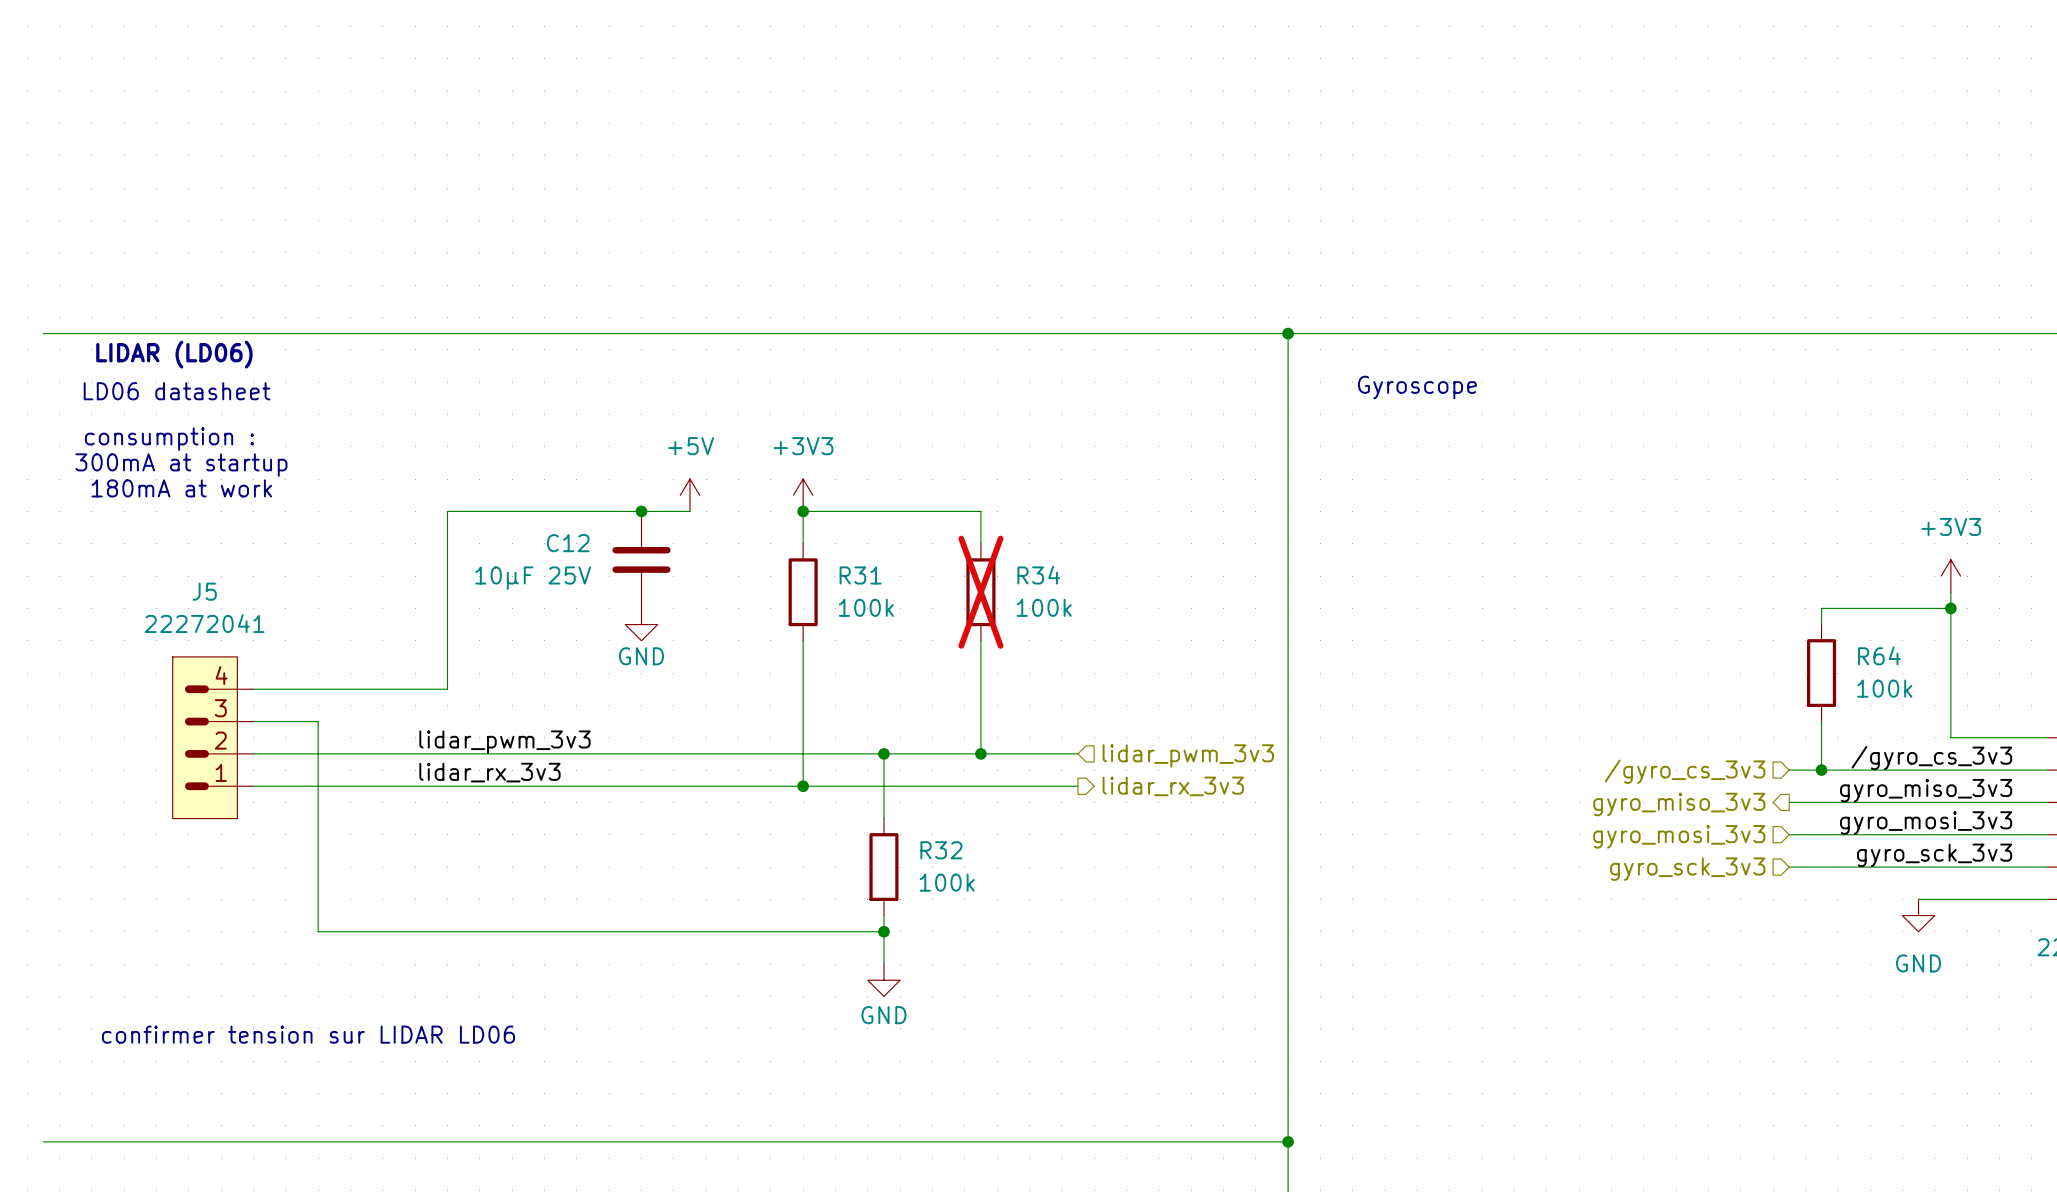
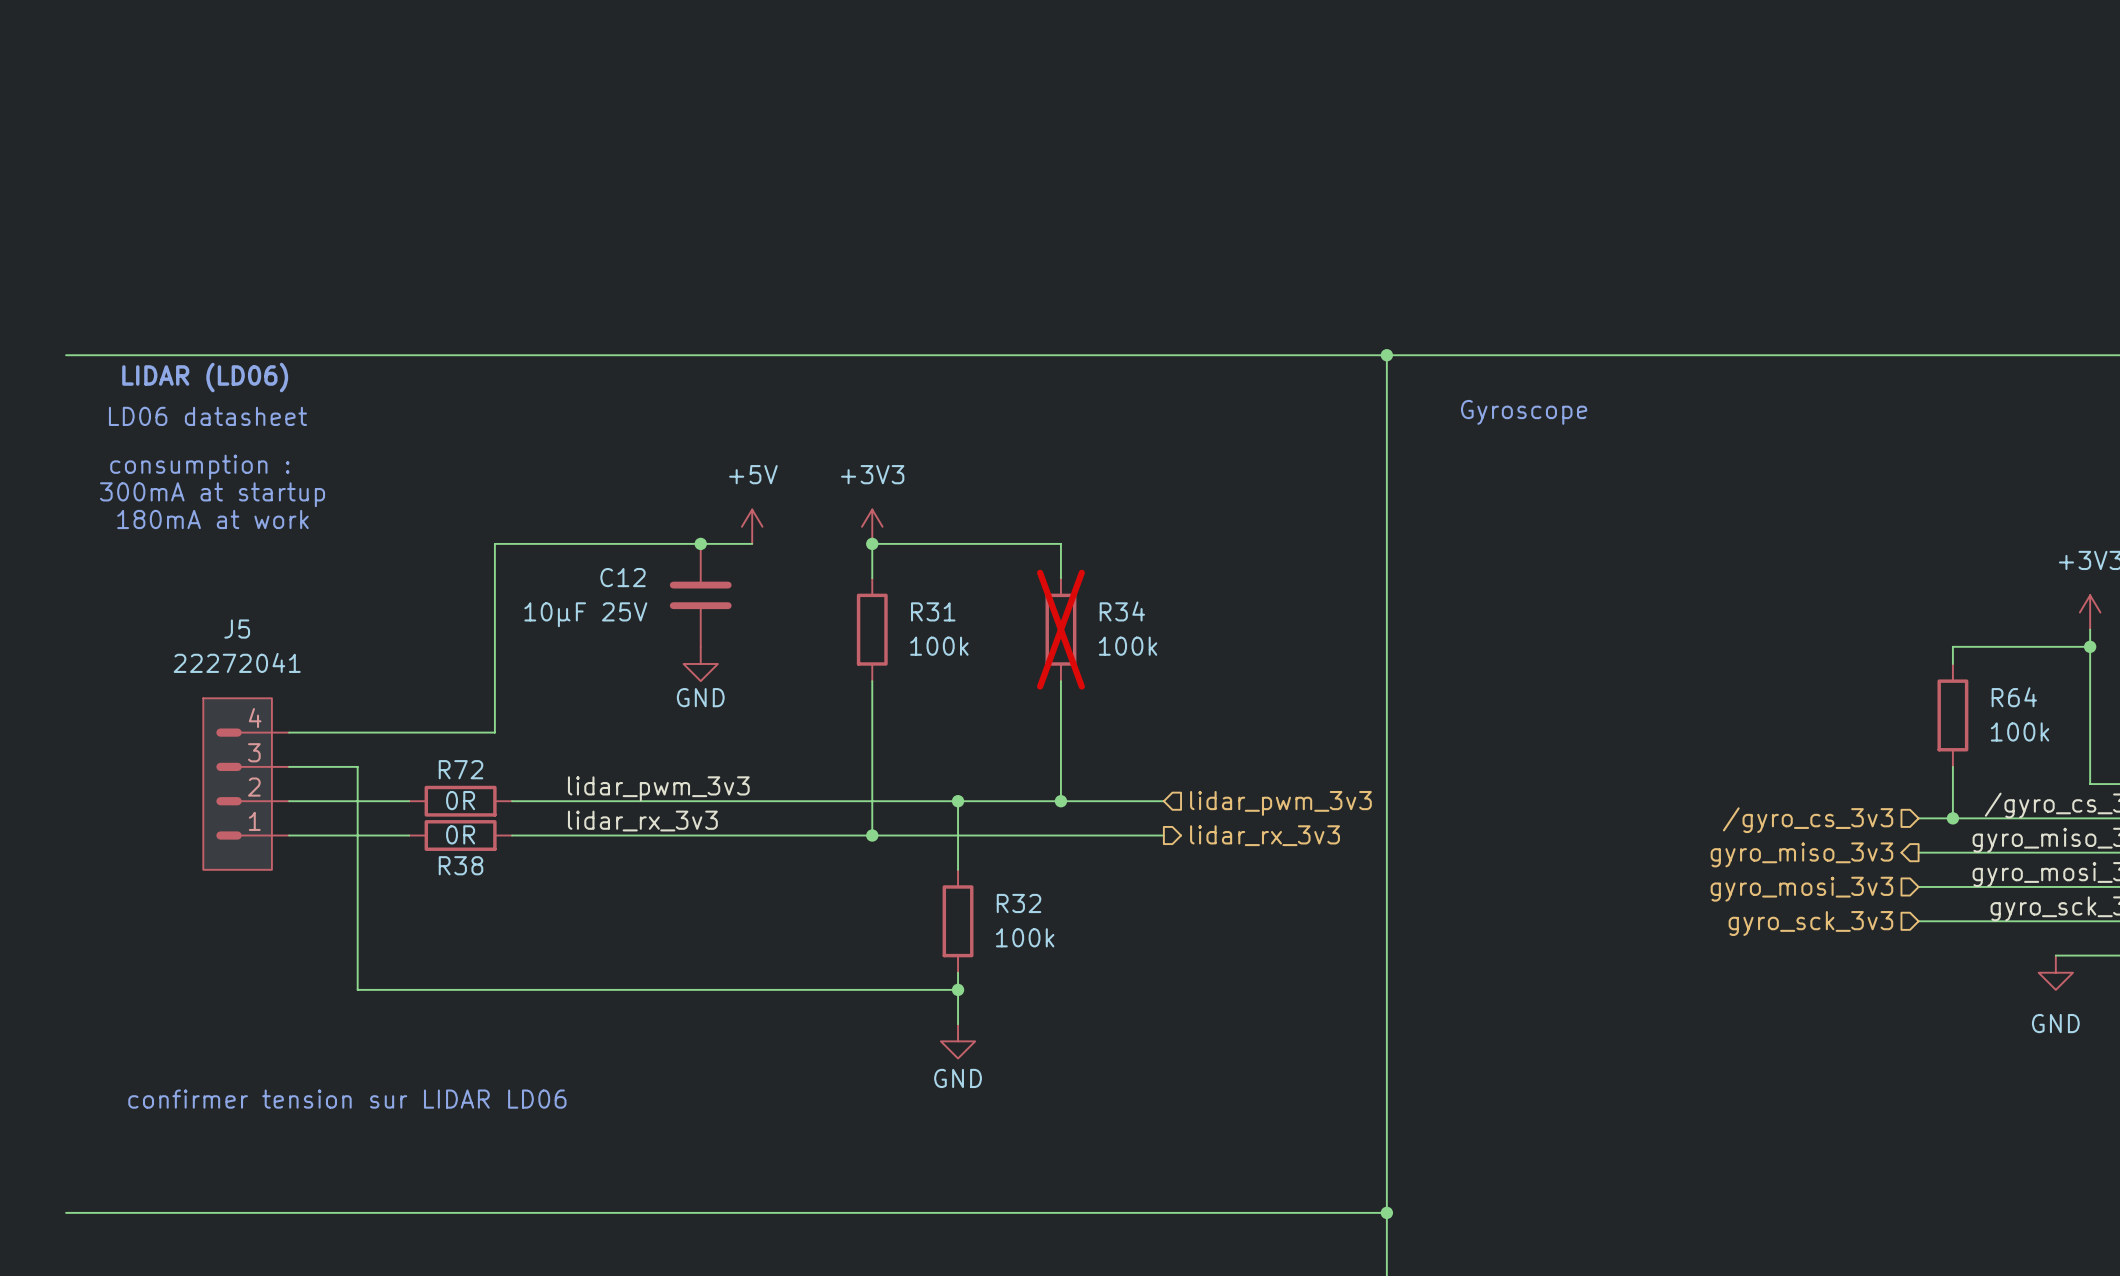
label position: lidar_pwm_3v3 (504, 742) -> lidar_pwm_3v3 (658, 788)
wire: (366, 753) (463, 753) -> none
R72: none -> 0R (460, 801)
label position: lidar_rx_3v3 (489, 772) -> lidar_rx_3v3 (642, 821)
wire: (366, 786) (463, 786) -> none
R38: none -> 0R (460, 835)

